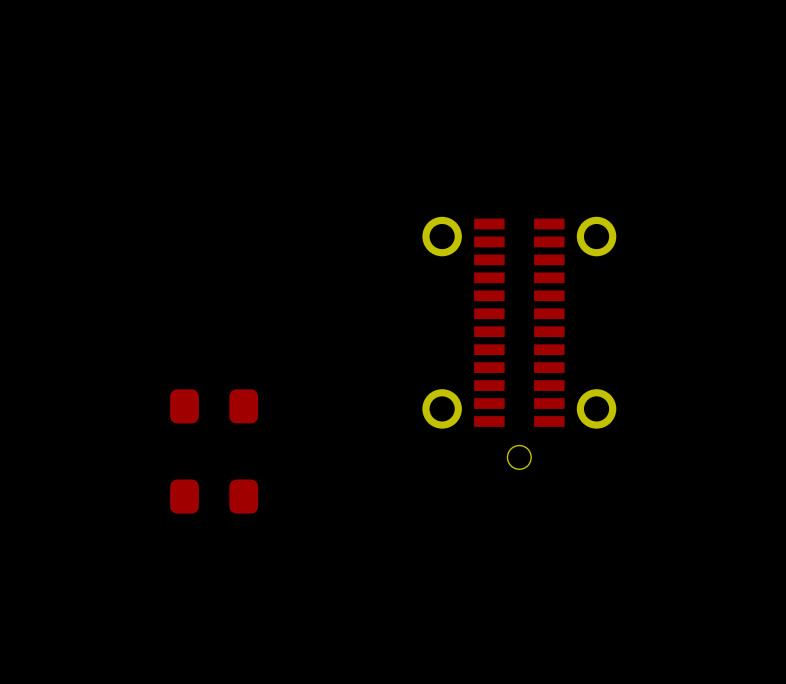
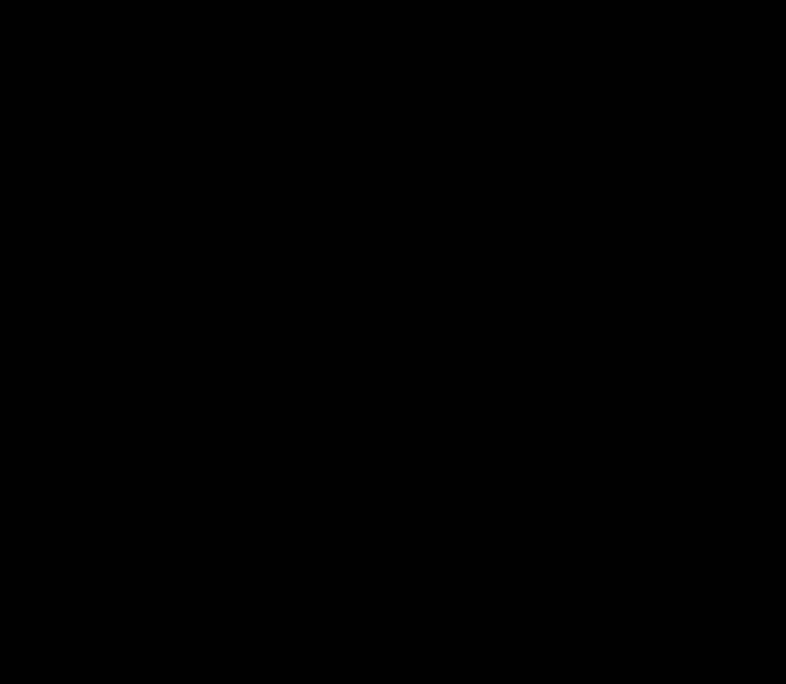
part: (519, 319) -> none
part: (214, 406) -> none
part: (214, 496) -> none

